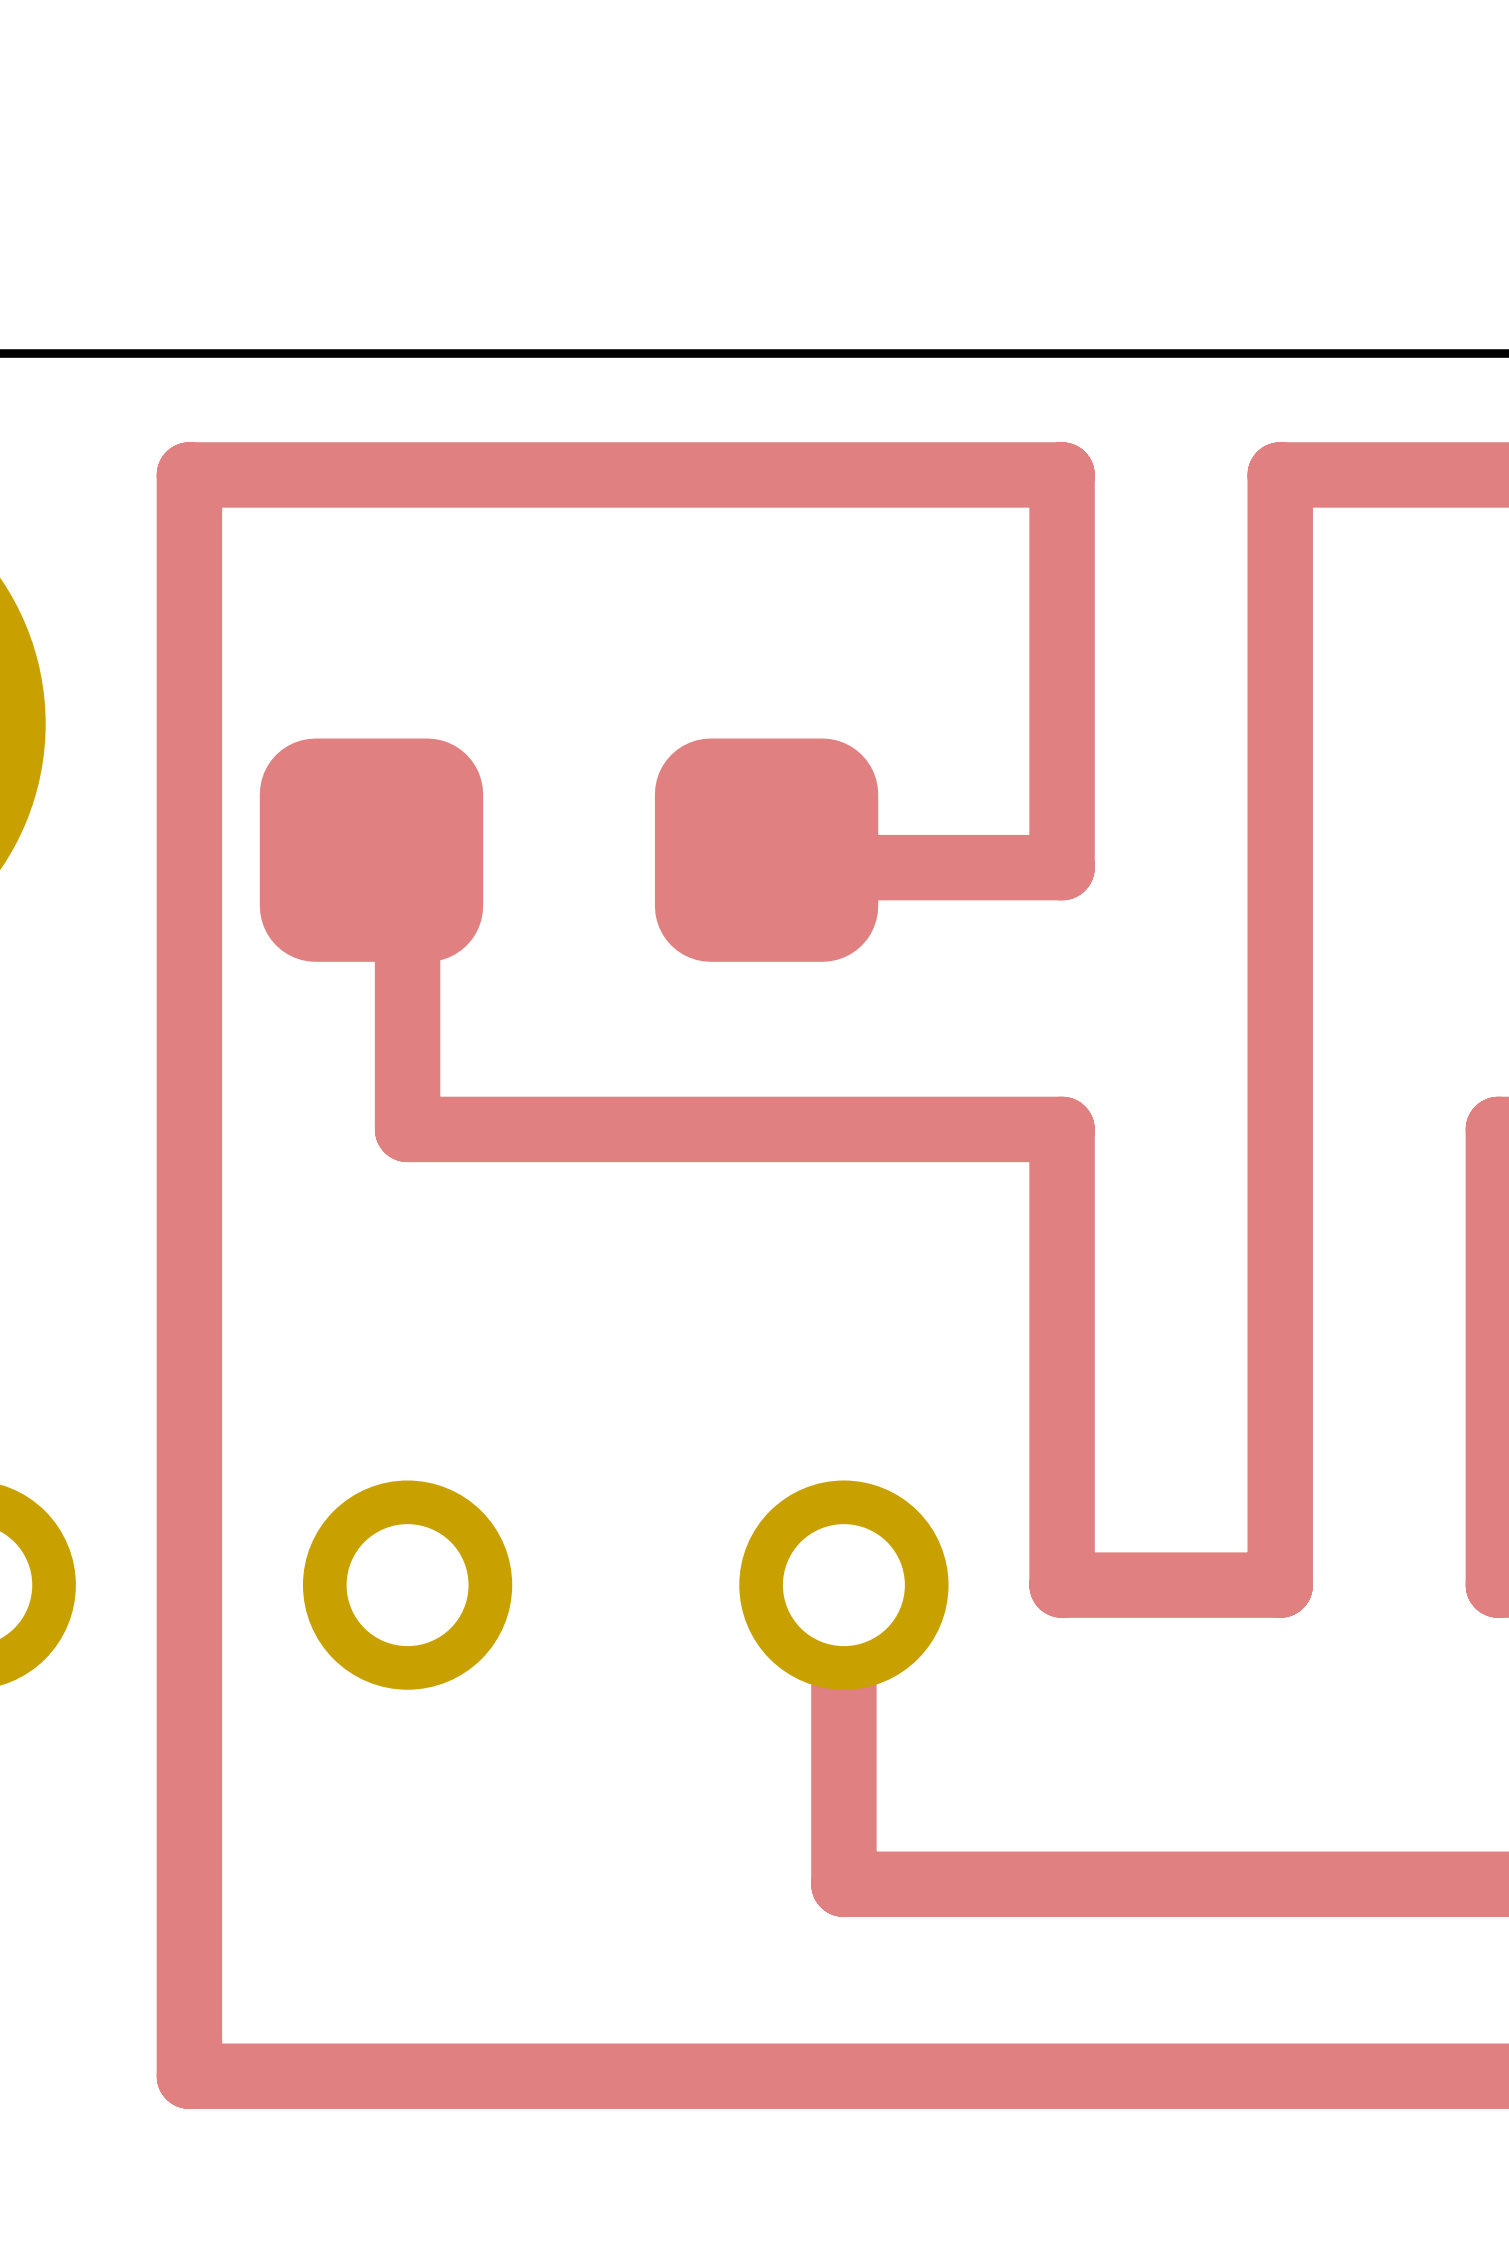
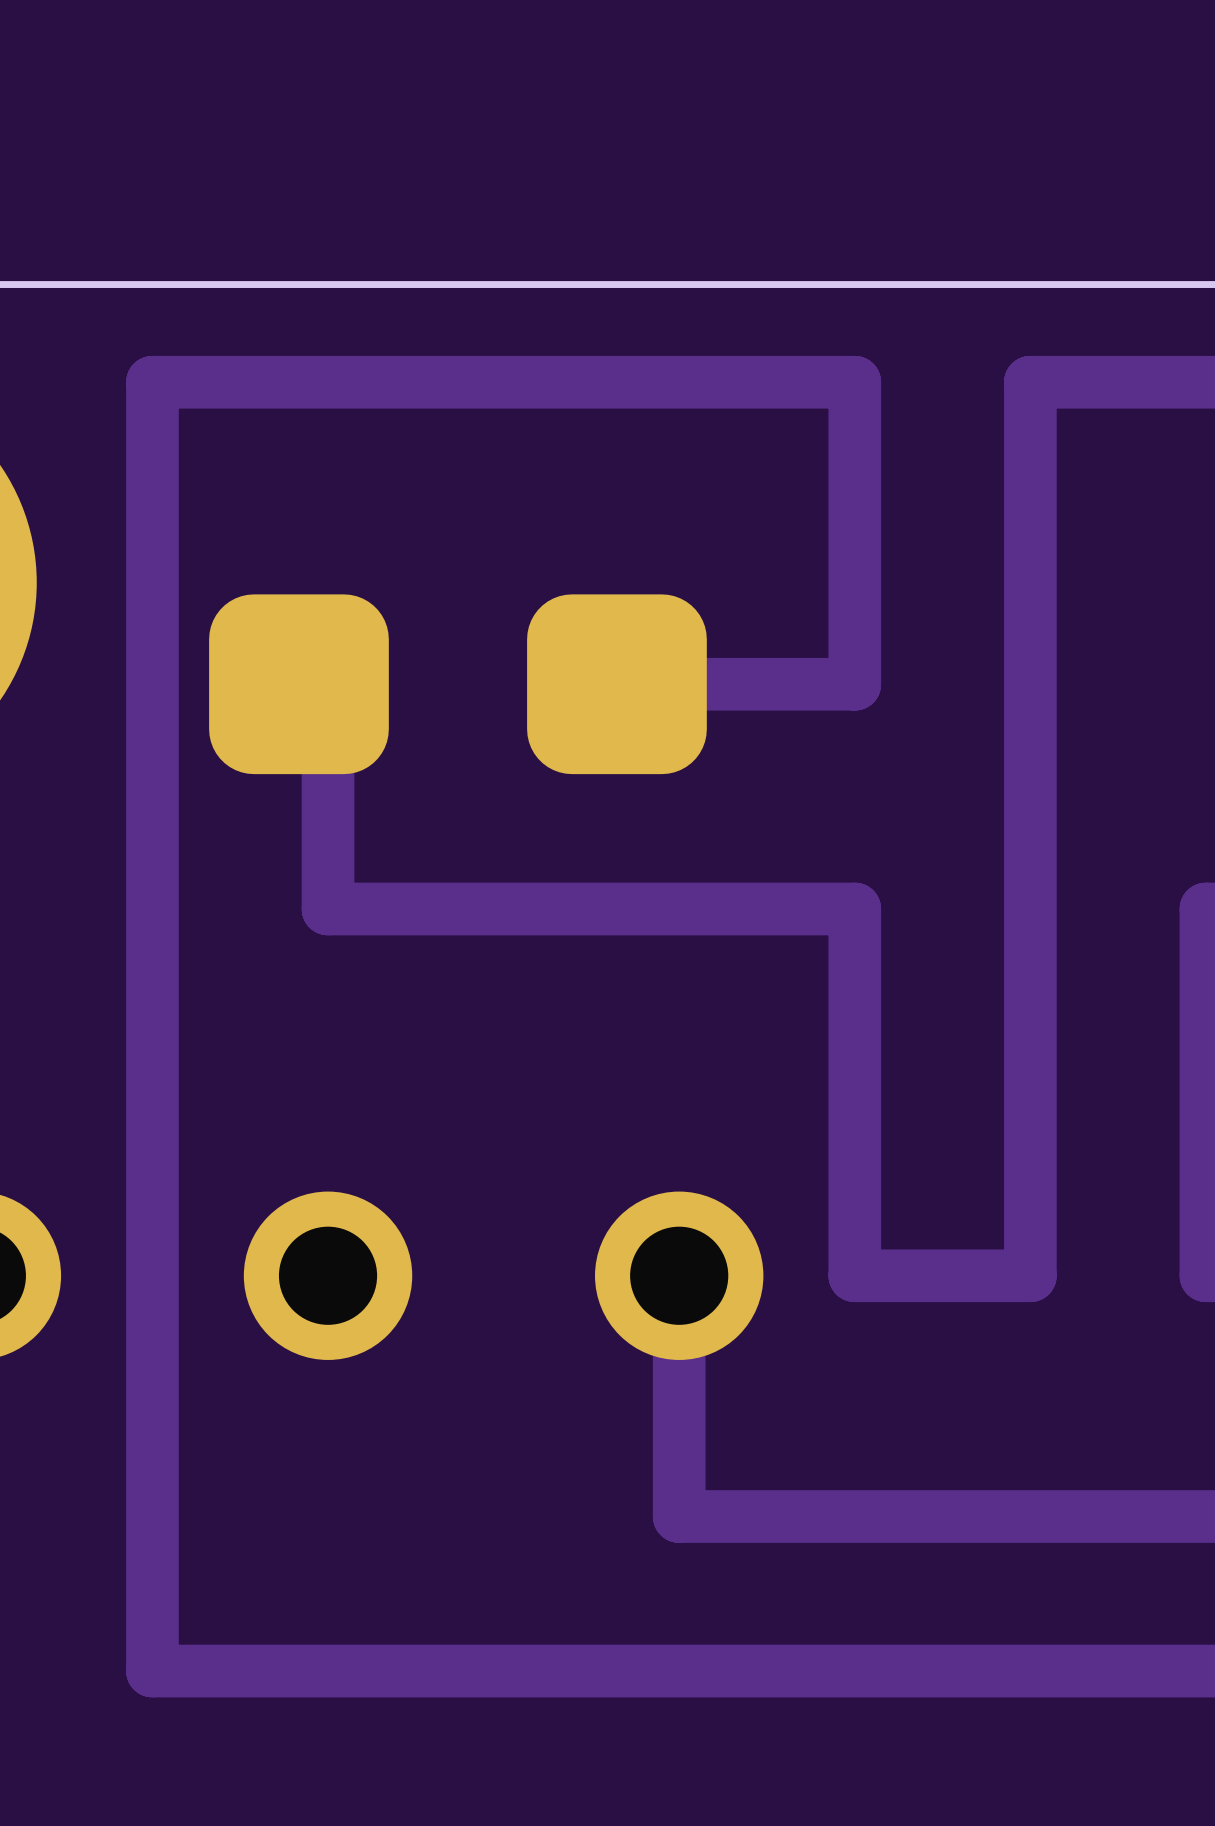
track: (766, 850) (784, 867) (1062, 867) (1062, 850) -> (616, 684) (854, 684)

